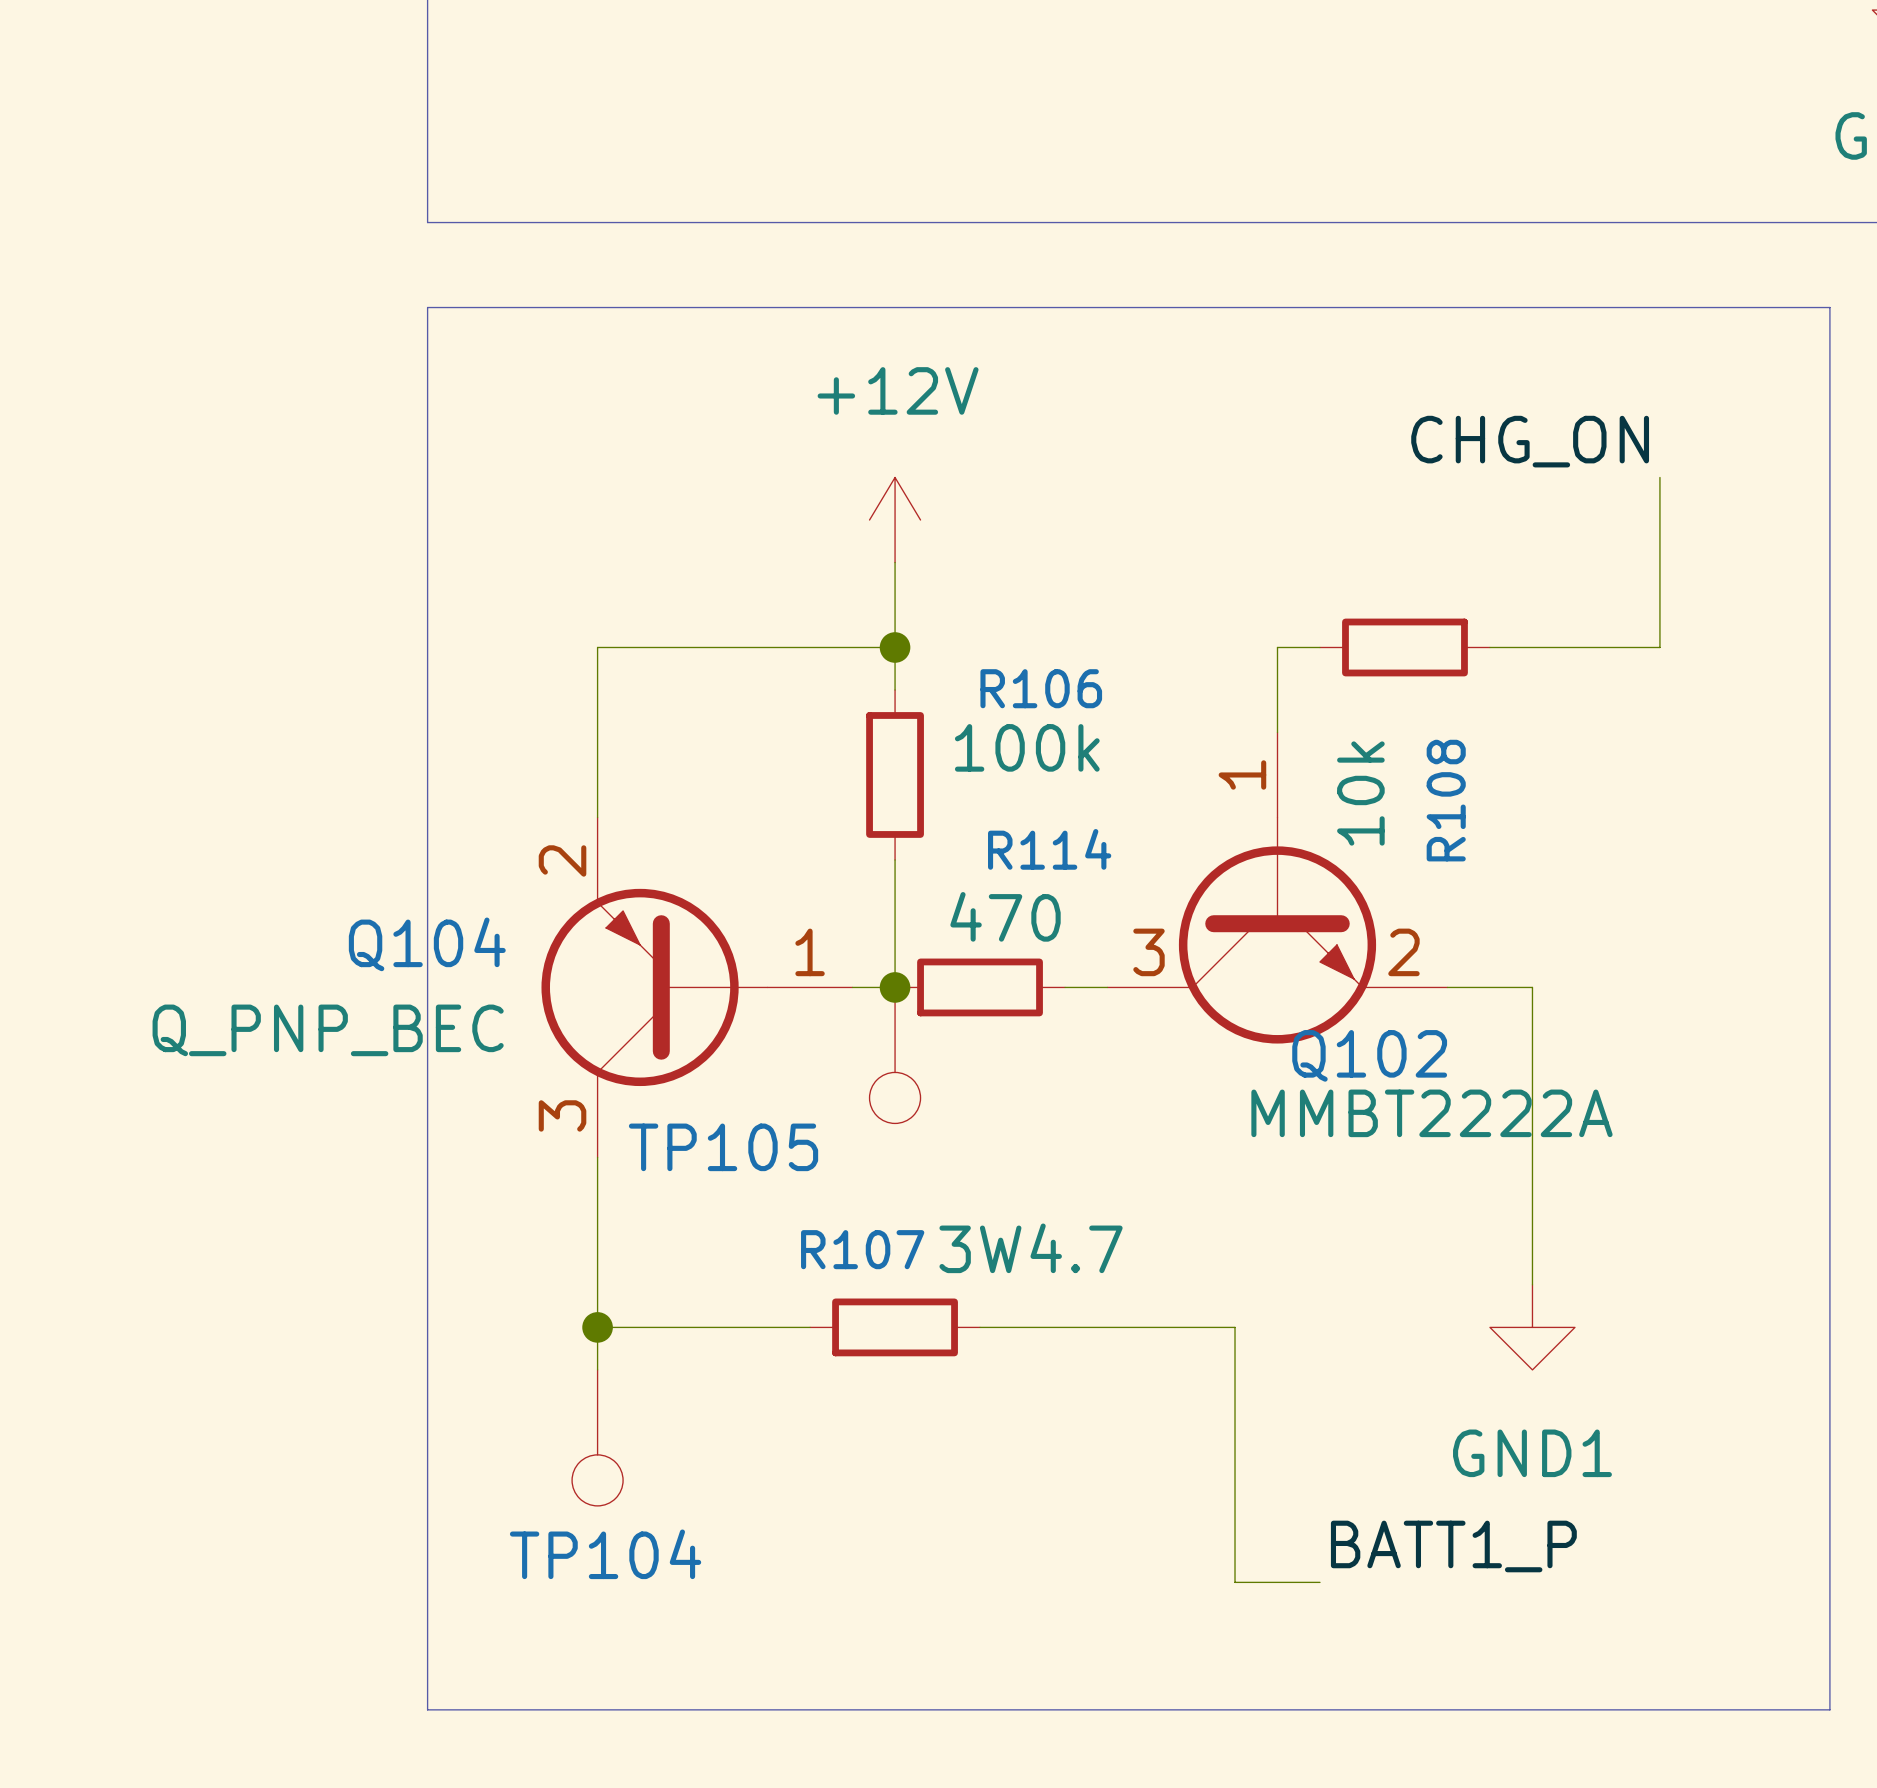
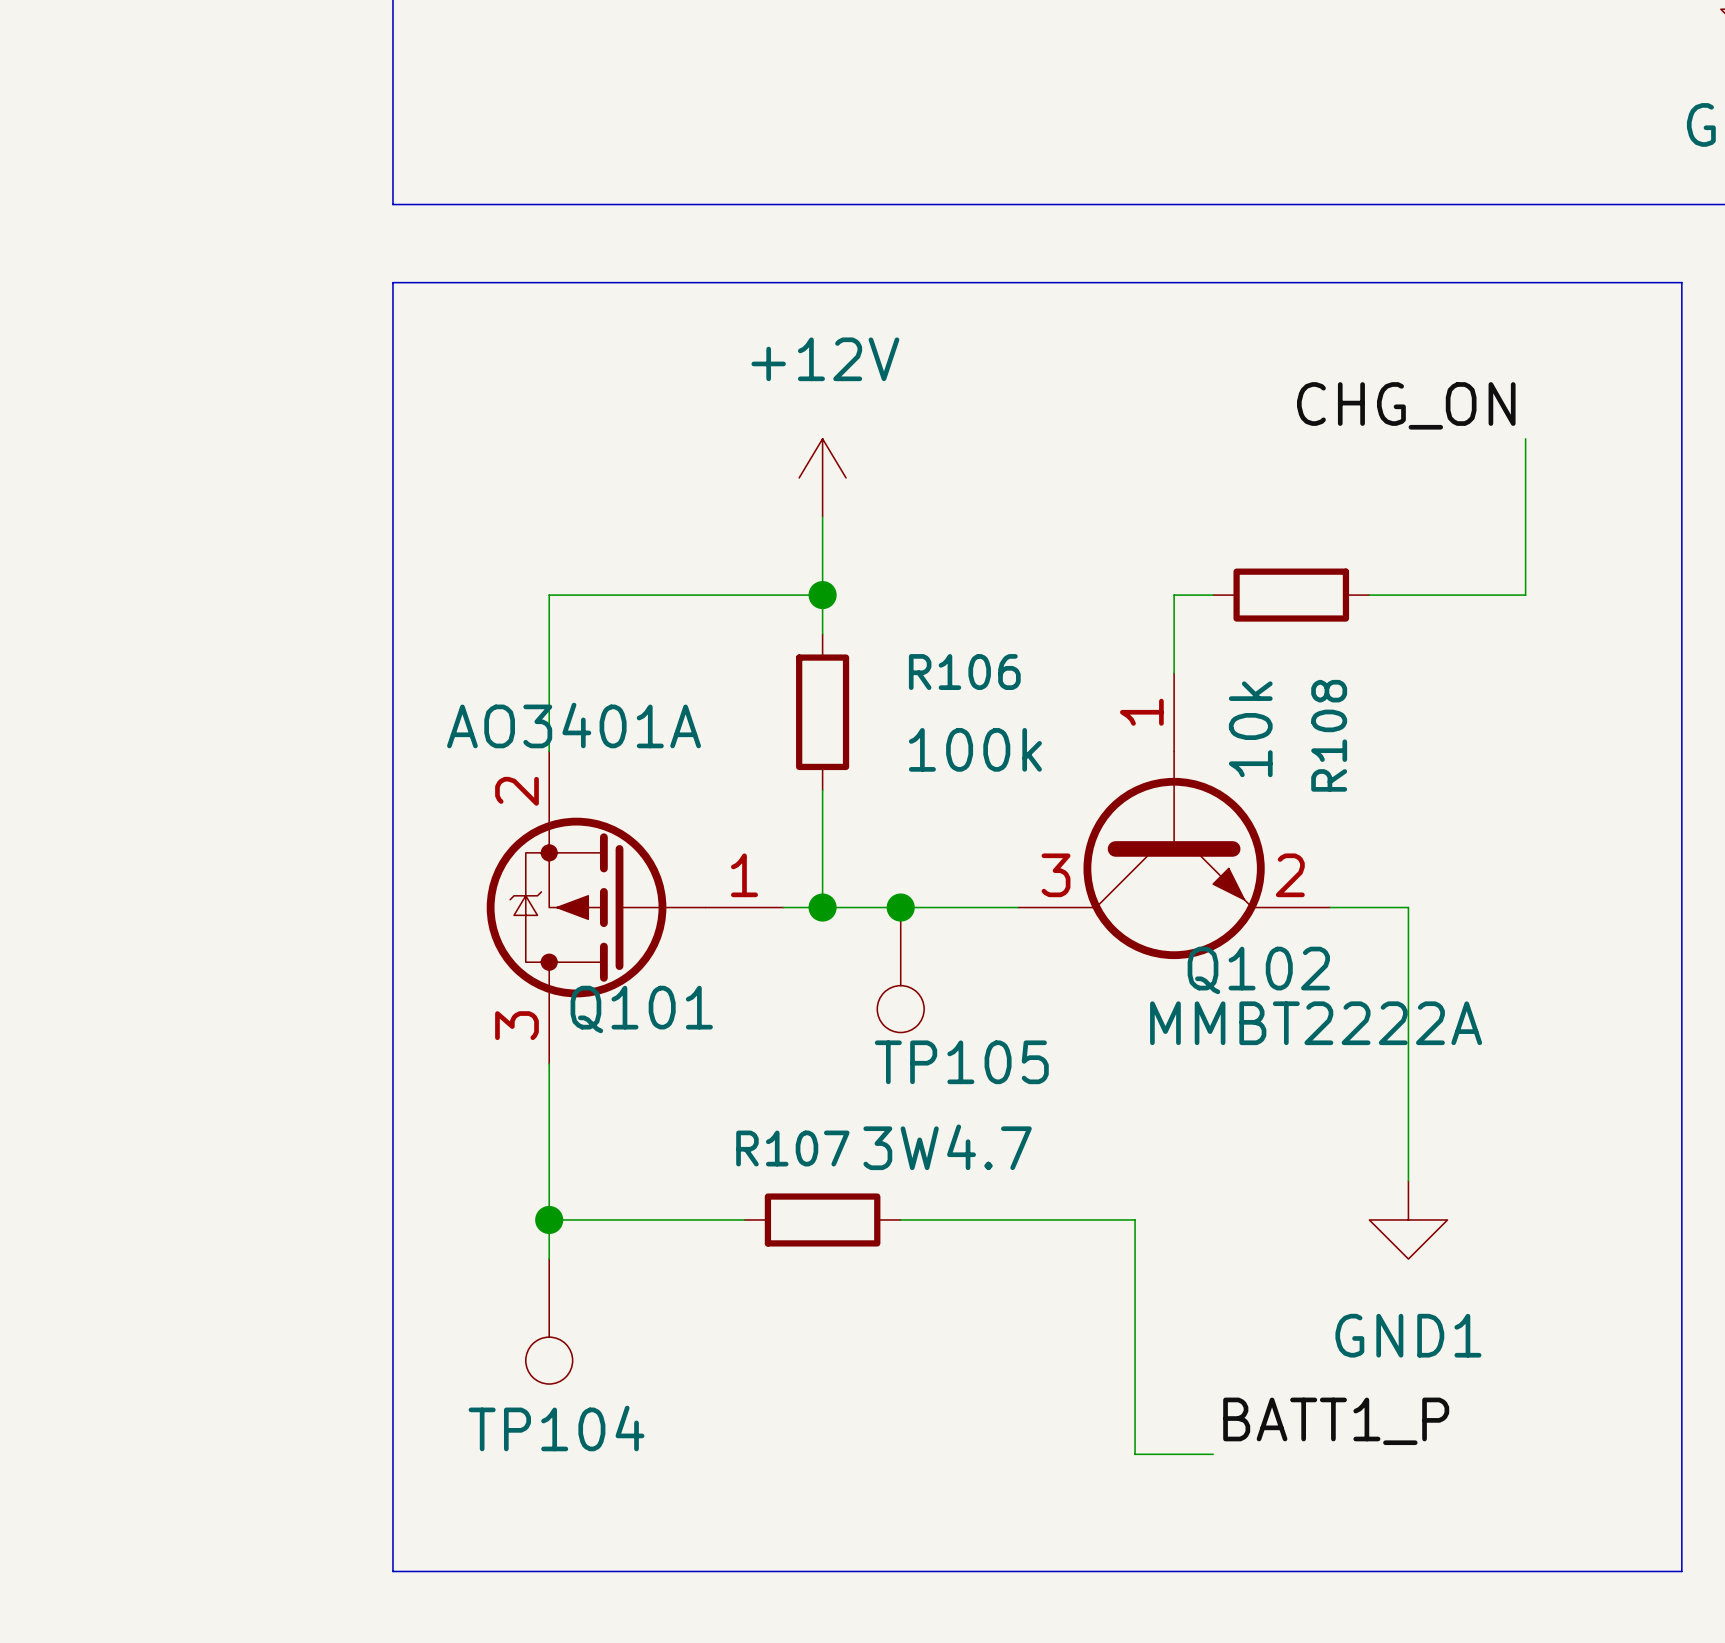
R106 name position: R106 (1041, 688) -> R106 (964, 672)
R106 value position: 100k (1027, 747) -> 100k (975, 749)
Q101: none -> AO3401A (635, 907)
Q104: Q_PNP_BEC (697, 987) -> none
wire: none -> (822, 907) (978, 907)
R114: 470 (980, 987) -> none
junction: none -> (900, 907)
TP105 position: (895, 1055) -> (900, 970)
TP105 name position: TP105 (723, 1147) -> TP105 (961, 1062)

